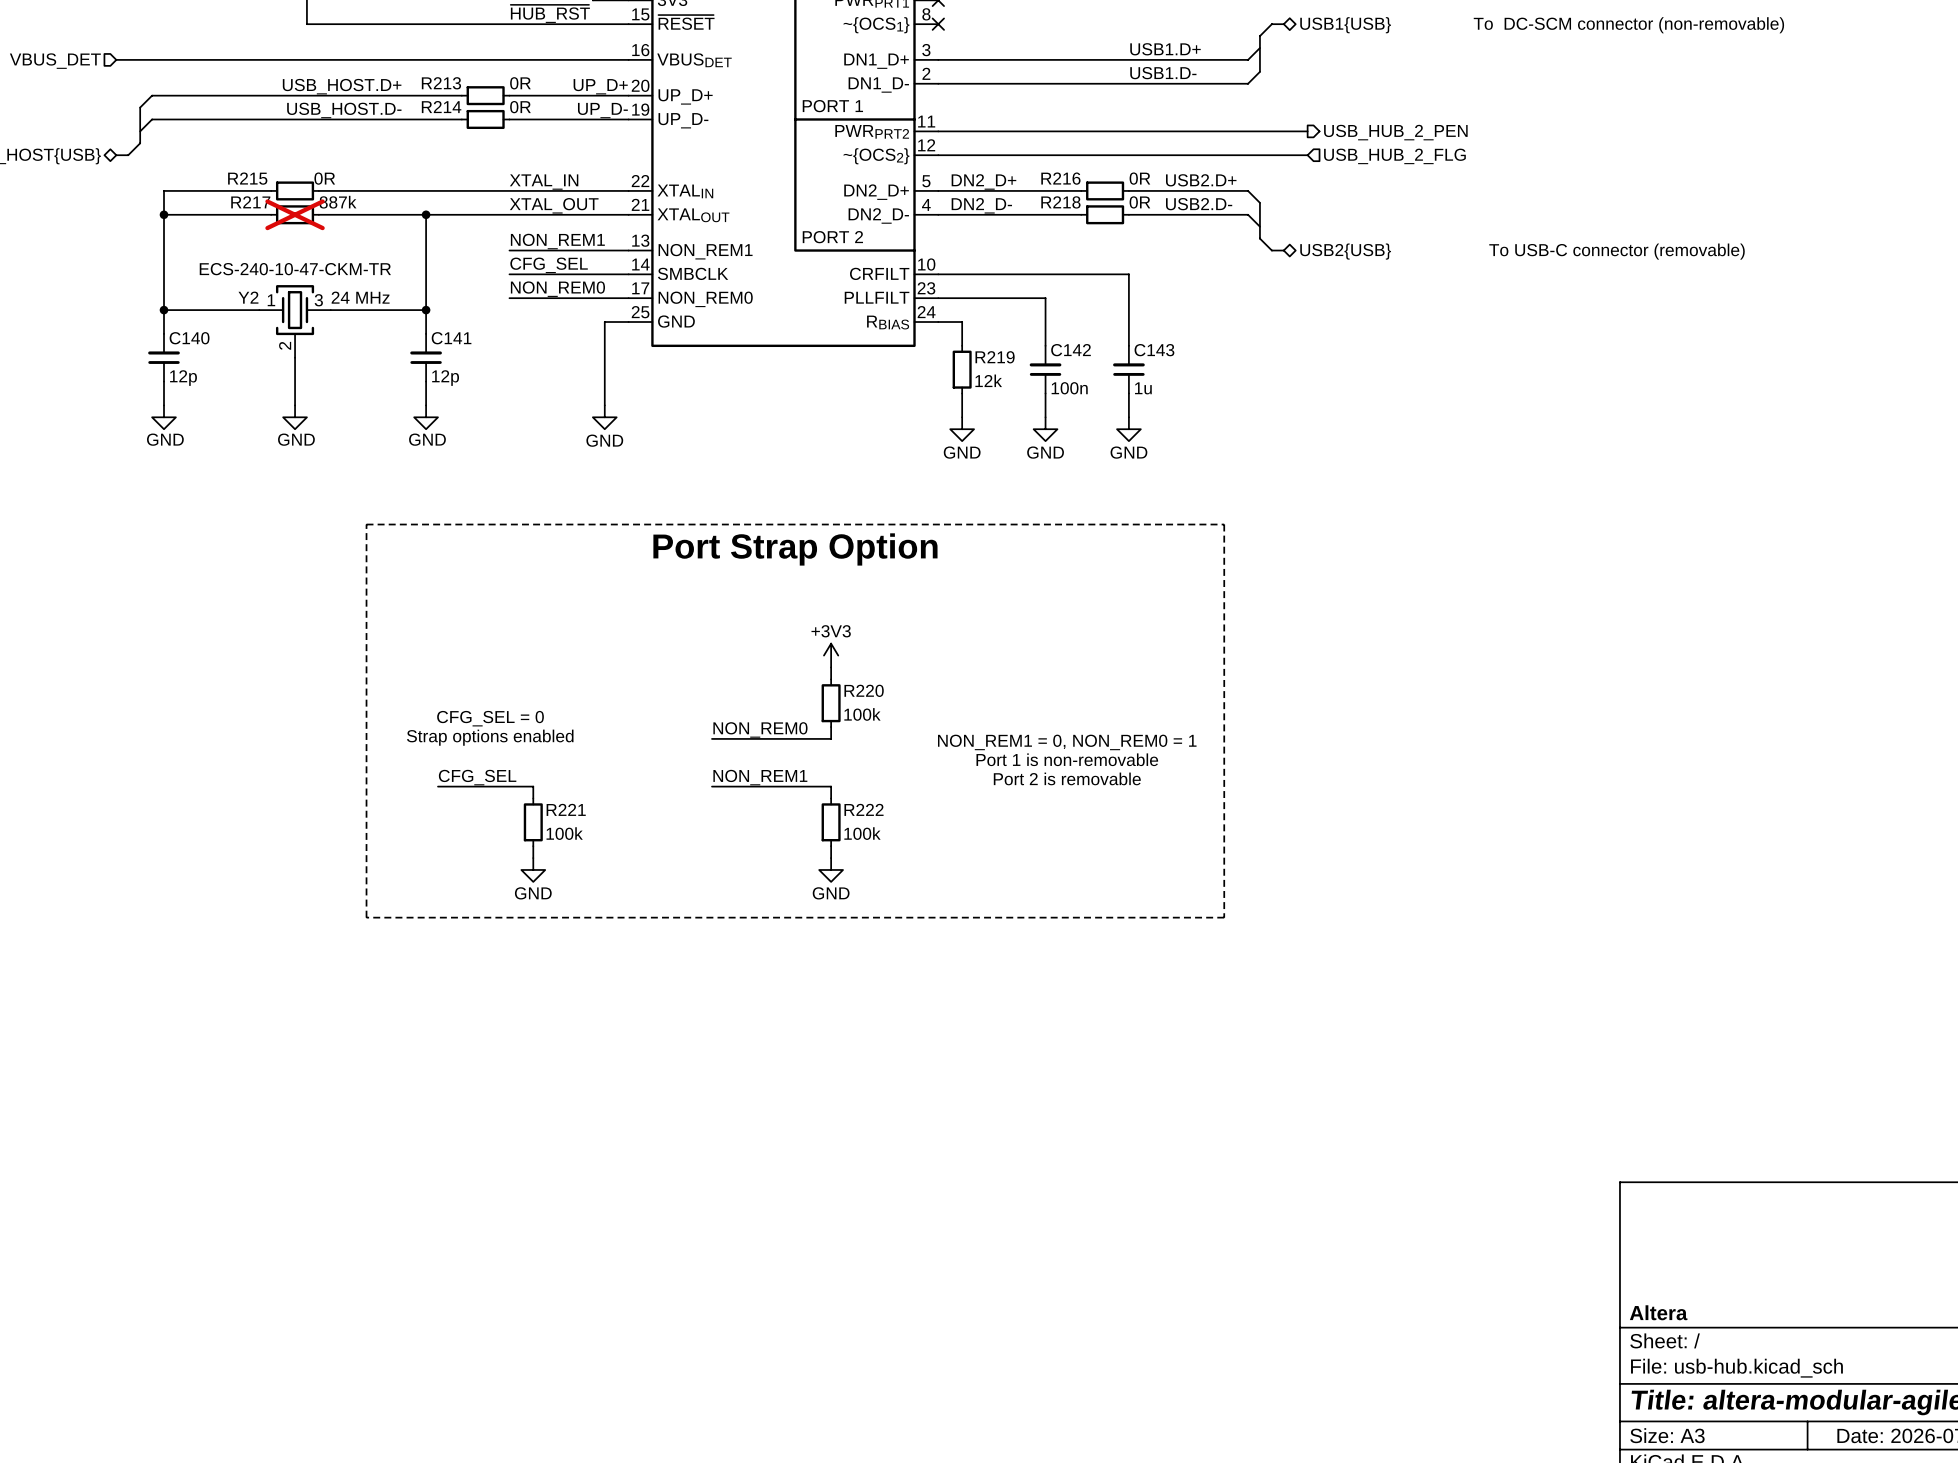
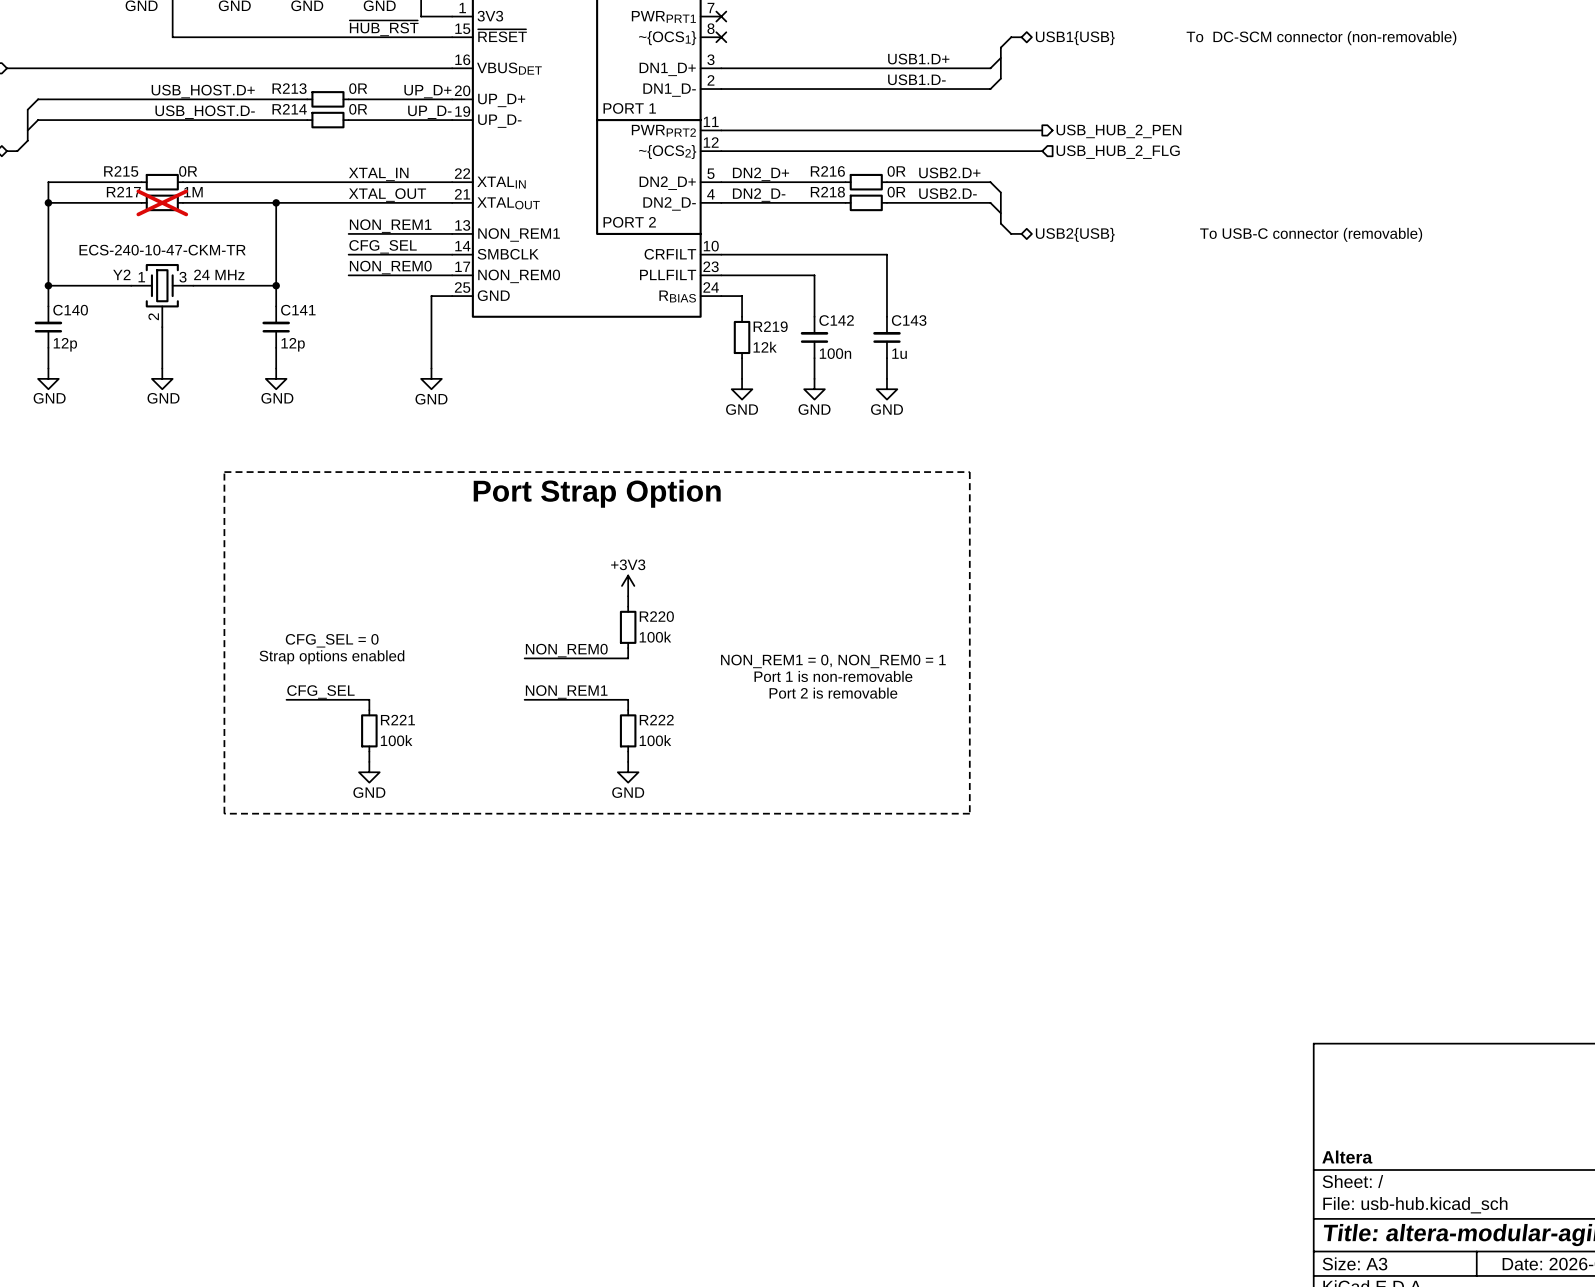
R217 text: 887k (338, 202) -> 1M (193, 192)

